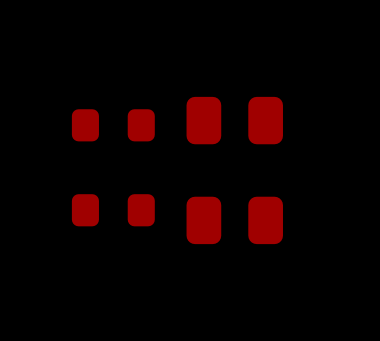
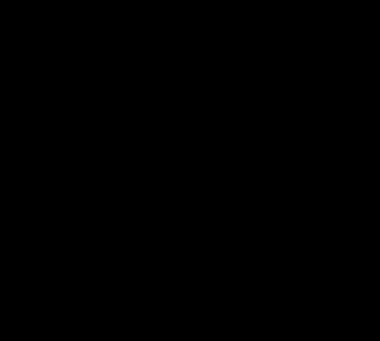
part: (234, 120) -> none
part: (113, 125) -> none
part: (113, 210) -> none
part: (234, 220) -> none

